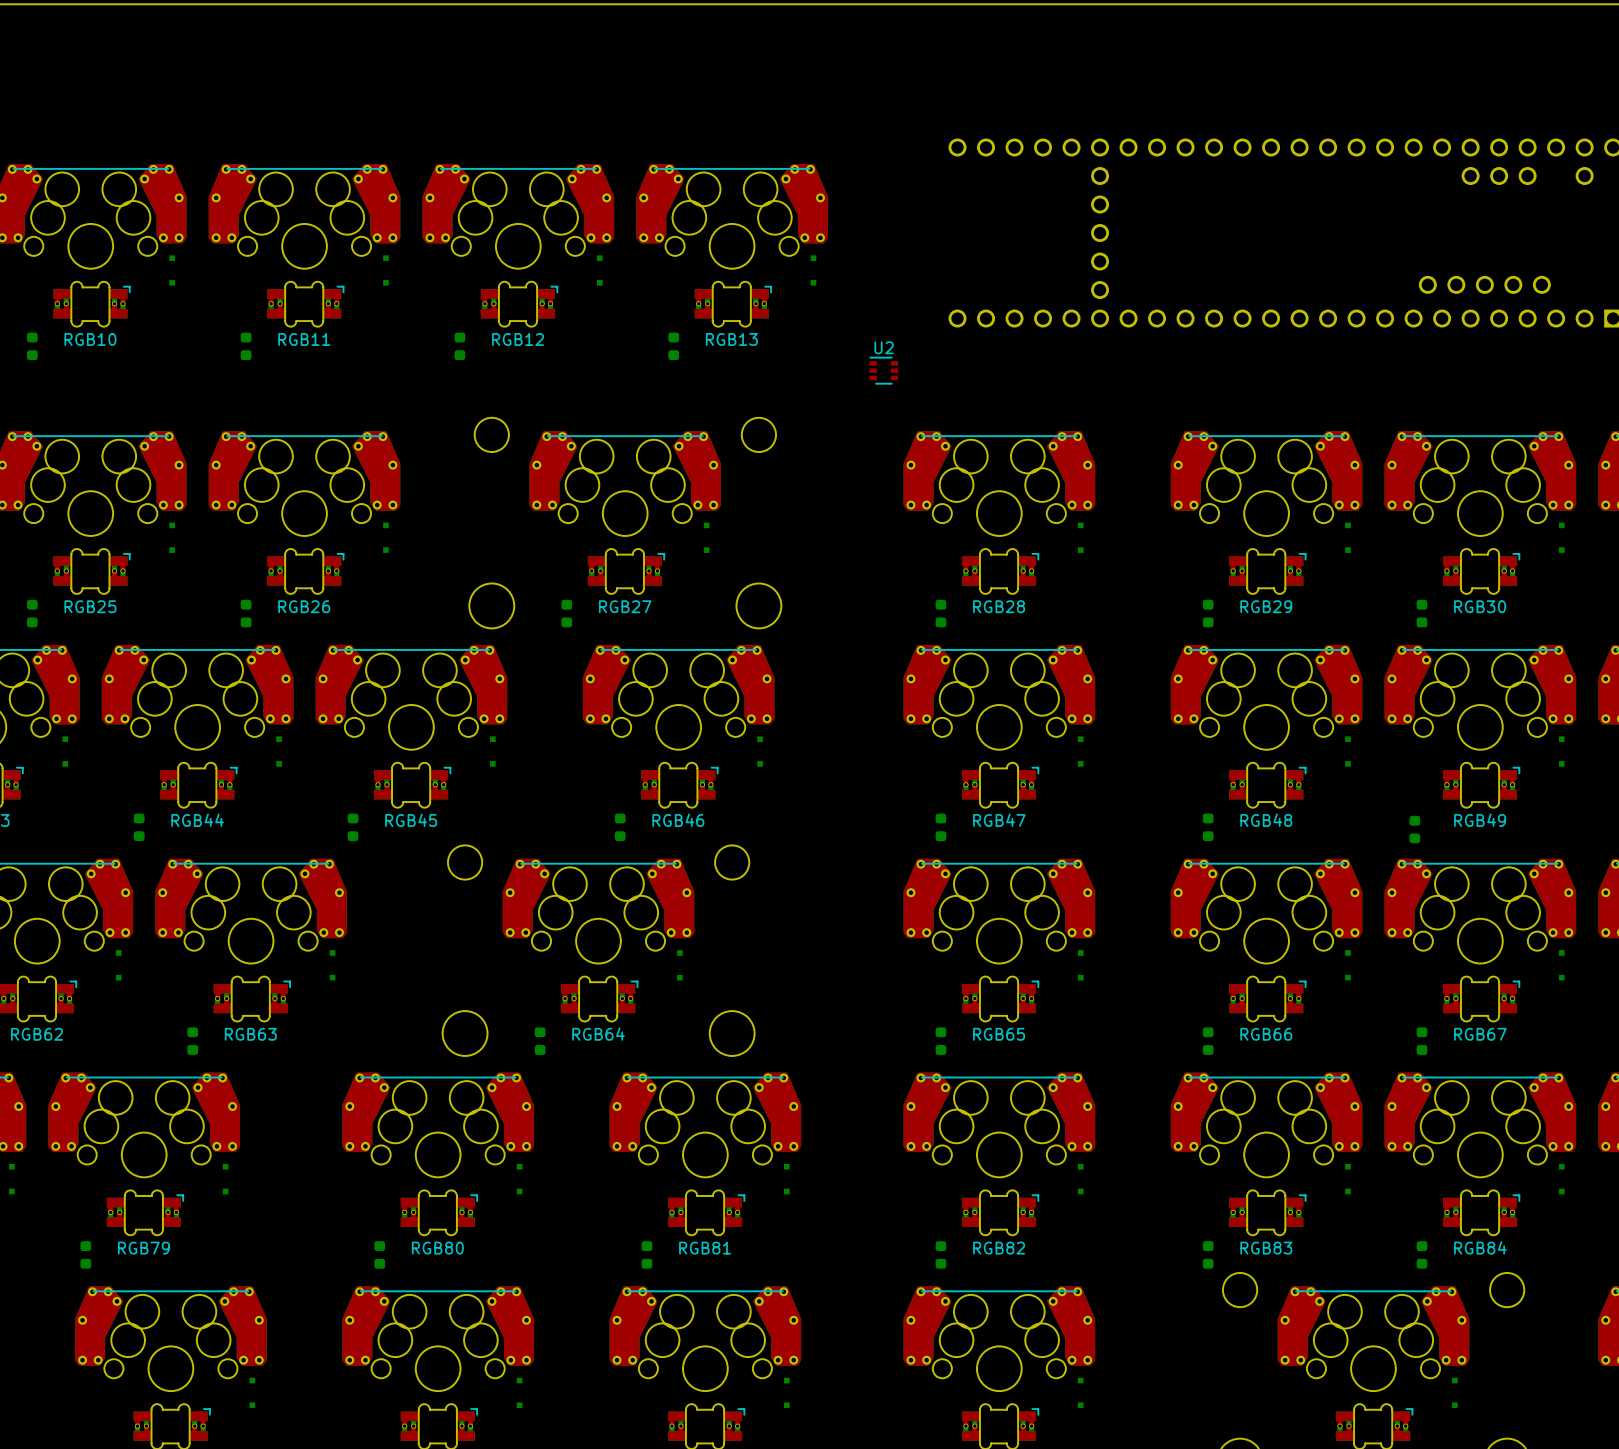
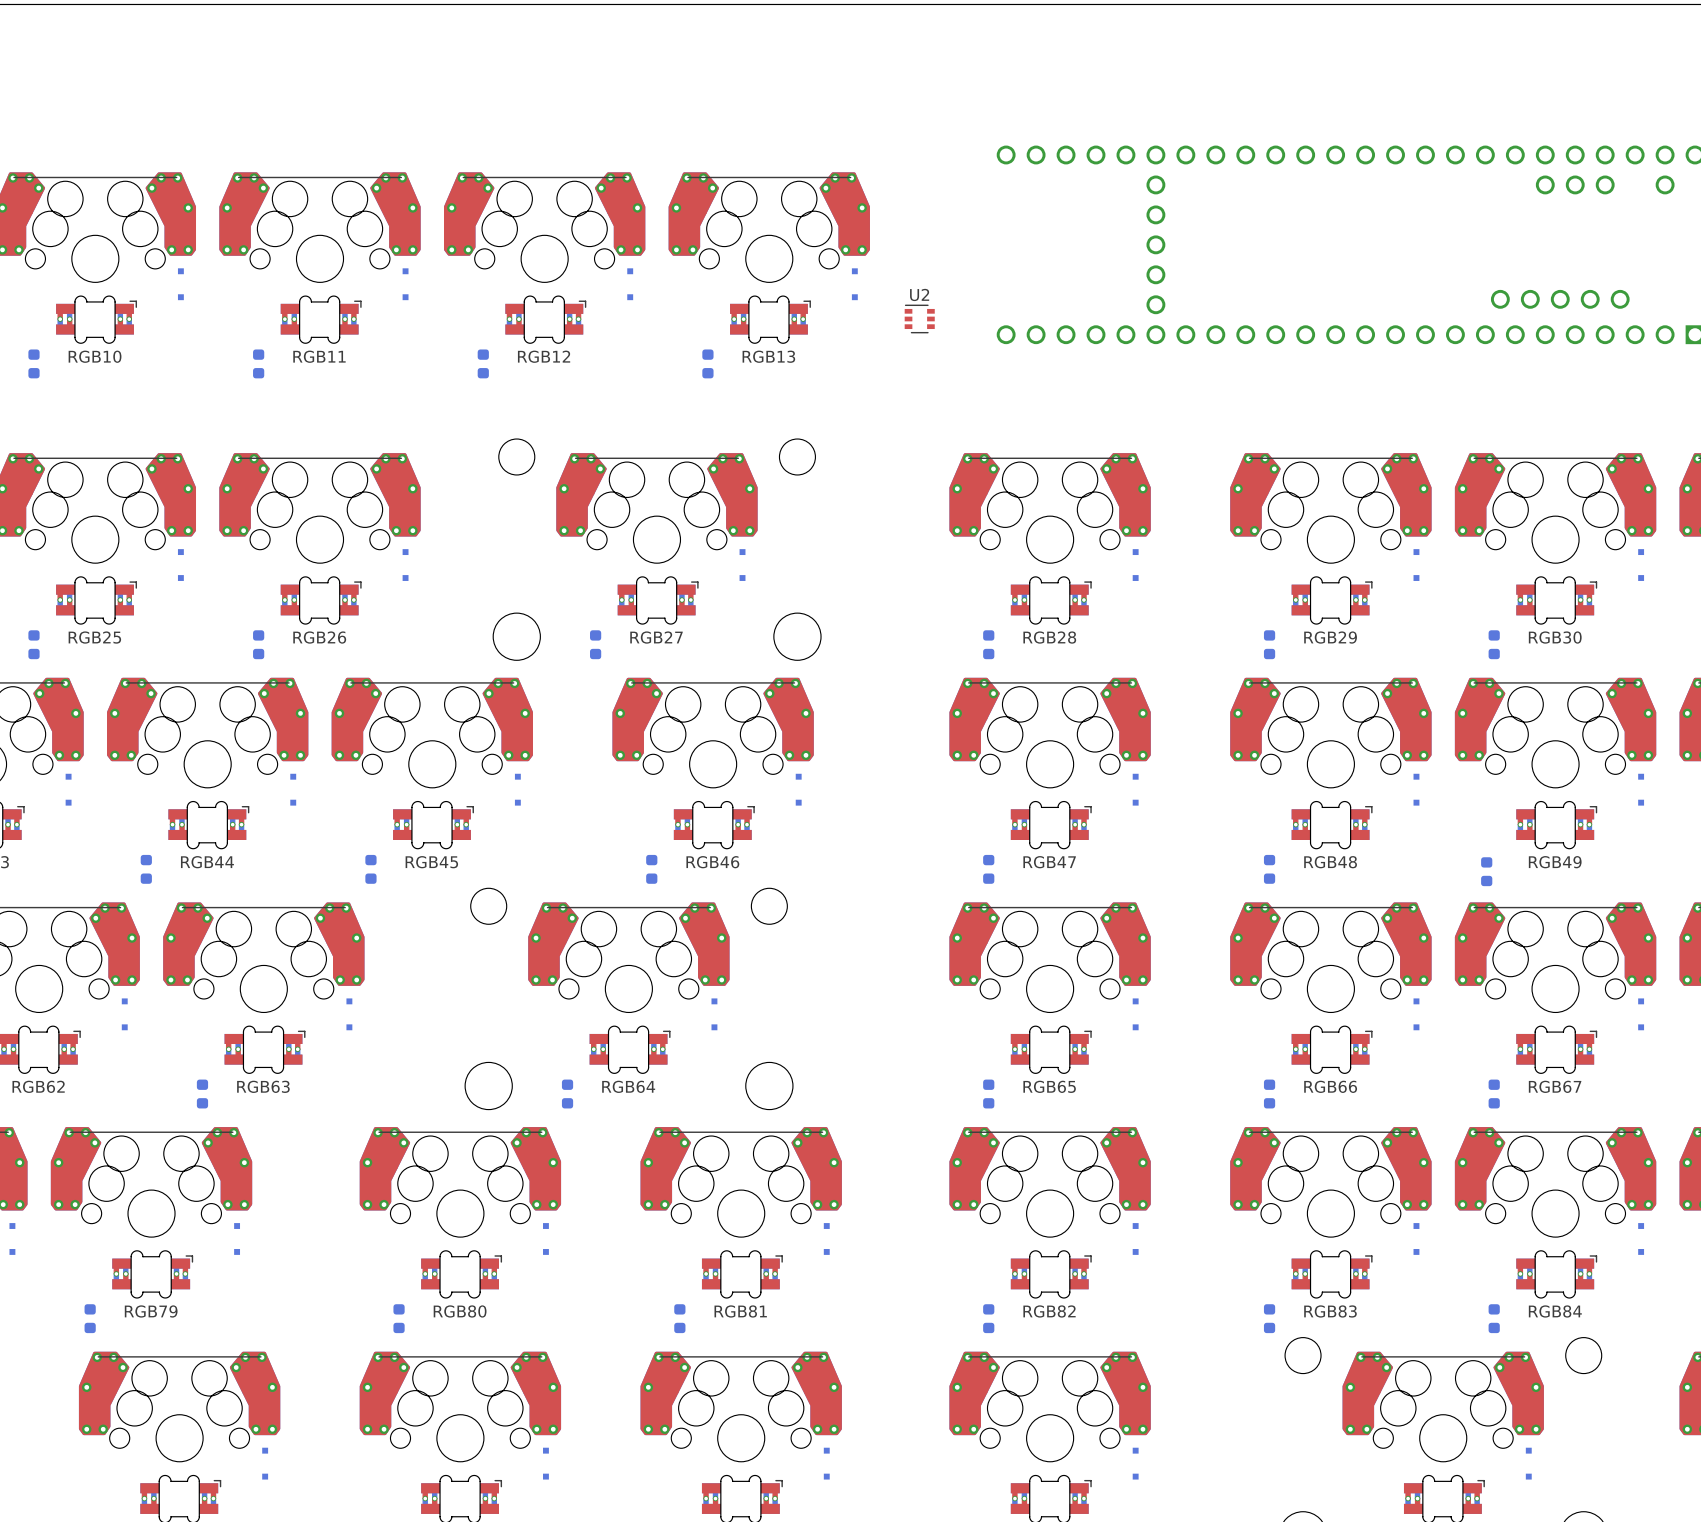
U2 position: (883, 370) -> (919, 318)

